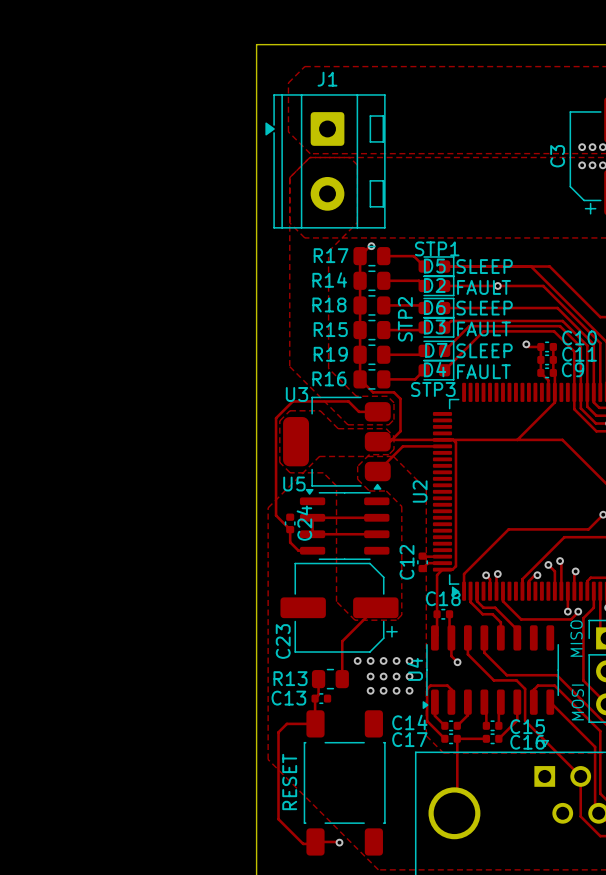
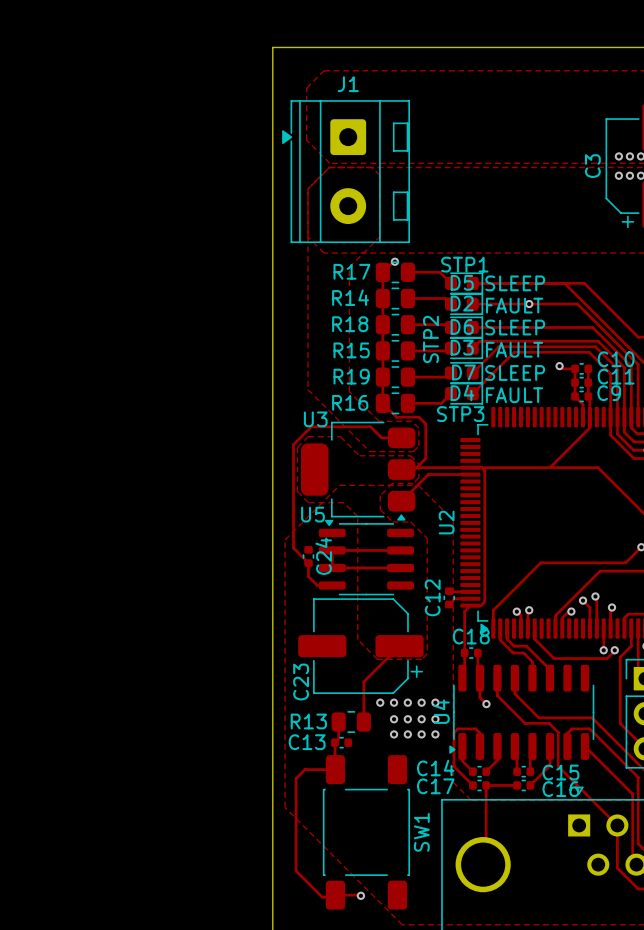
text: MISO (576, 638) -> none
text: MOSI (577, 702) -> none
RESET name: RESET (289, 782) -> SW1 (421, 832)

